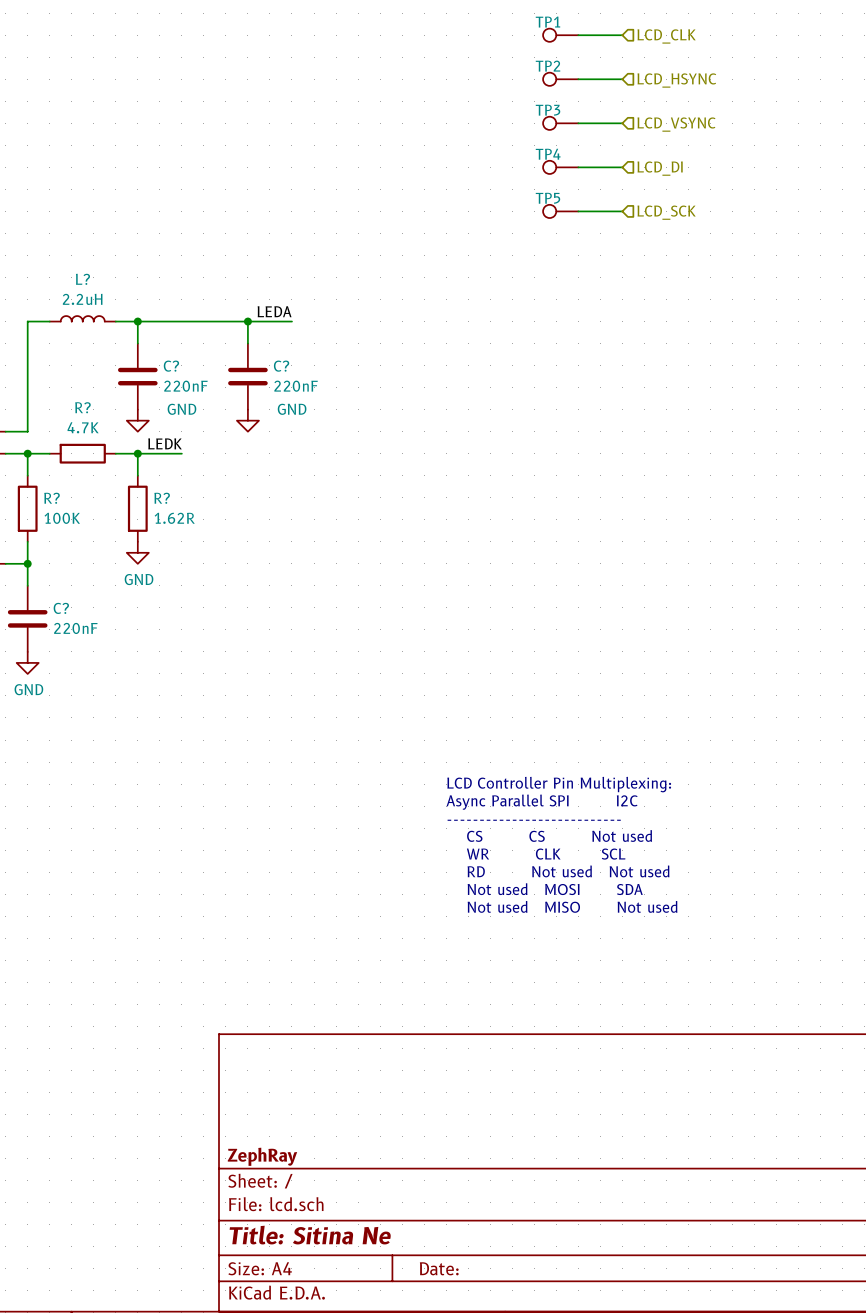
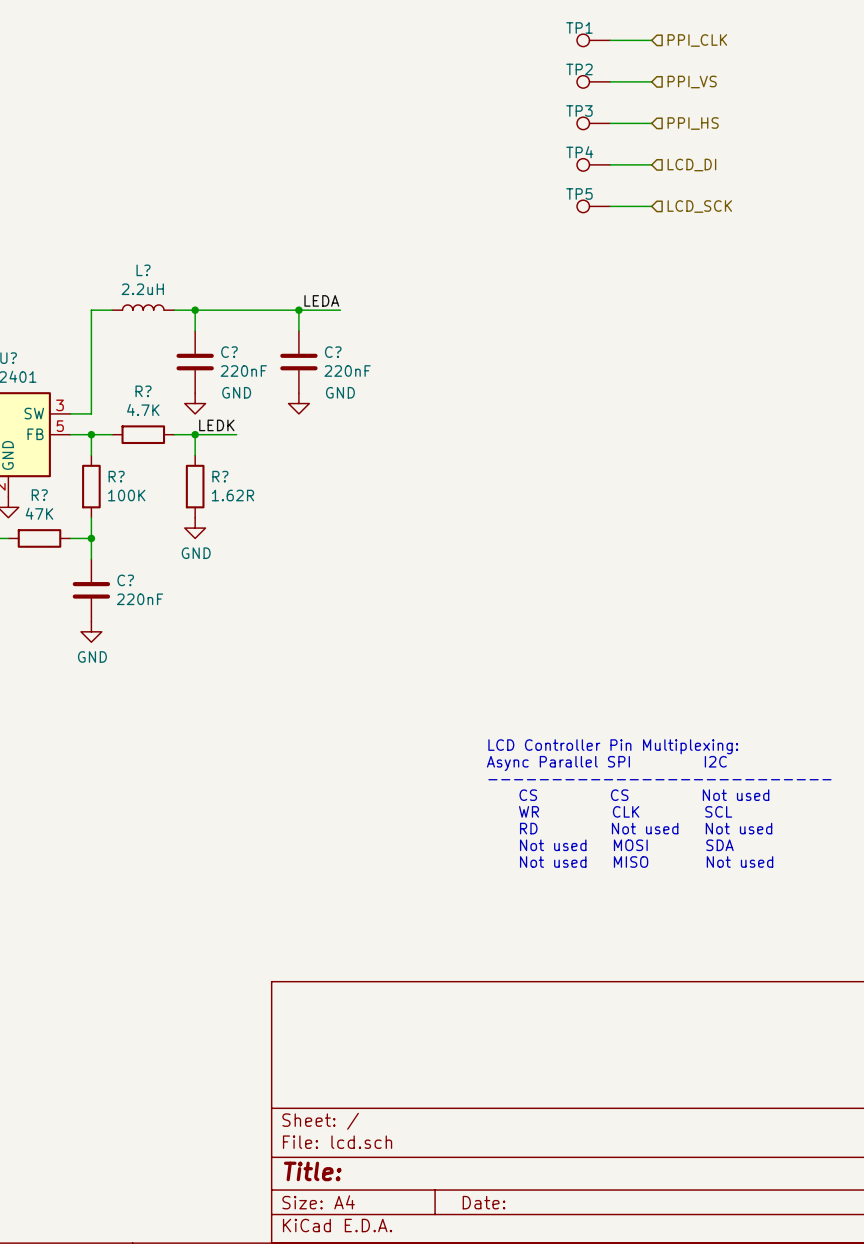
hierarchical label: LCD_CLK (666, 36) -> PPI_CLK (697, 40)
hierarchical label: LCD_HSYNC (676, 80) -> PPI_VS (692, 82)
hierarchical label: LCD_VSYNC (676, 124) -> PPI_HS (693, 123)
title block: ZephRay (262, 1156) -> none
title block: Title: Sitina Ne (310, 1235) -> Title: (312, 1171)

